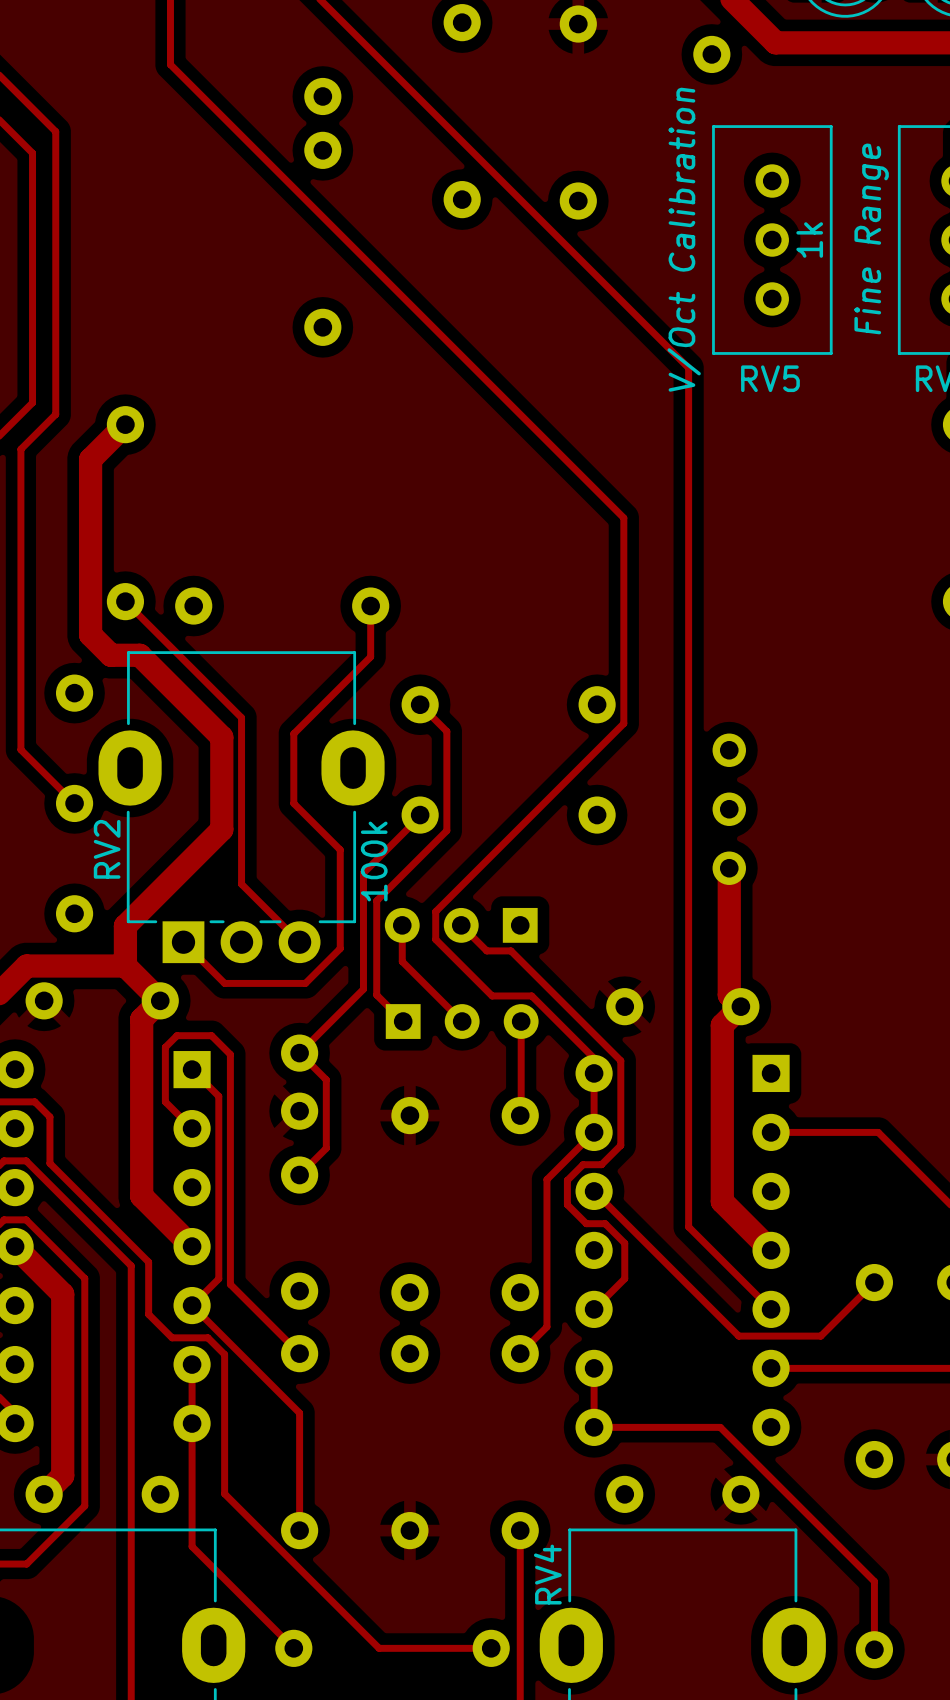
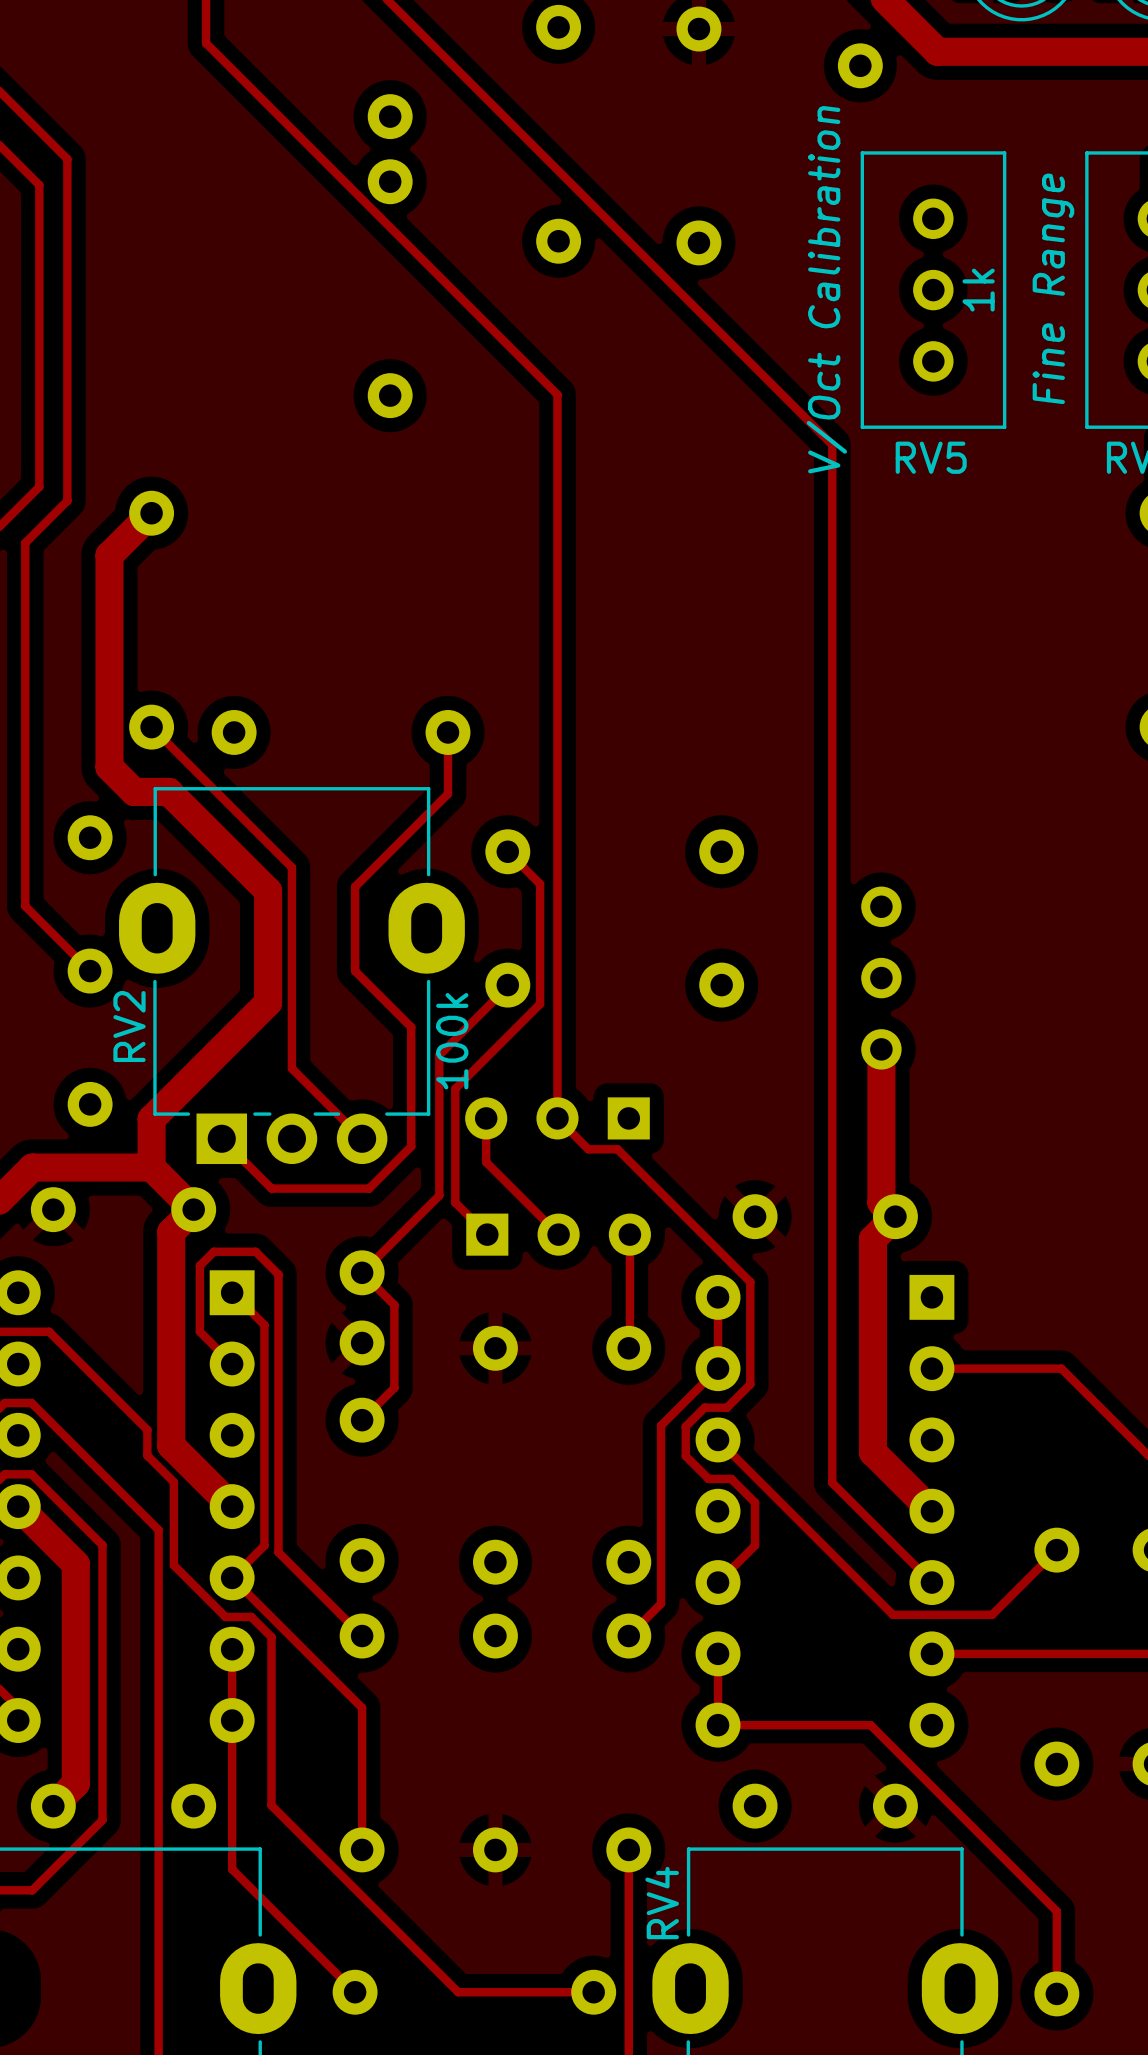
track: (170, 35) (170, 64) (623, 518) (623, 723) (435, 911) (435, 939) (492, 995) (531, 995) (594, 1058) (594, 1073) -> (206, 43) (557, 394) (557, 1118)
track: (34, 1101) (49, 1116) (49, 1163) (148, 1262) (148, 1314) (172, 1337) (186, 1337) -> (42, 1331) (49, 1331) (147, 1429) (147, 1455) (173, 1482) (173, 1565) (225, 1616)

